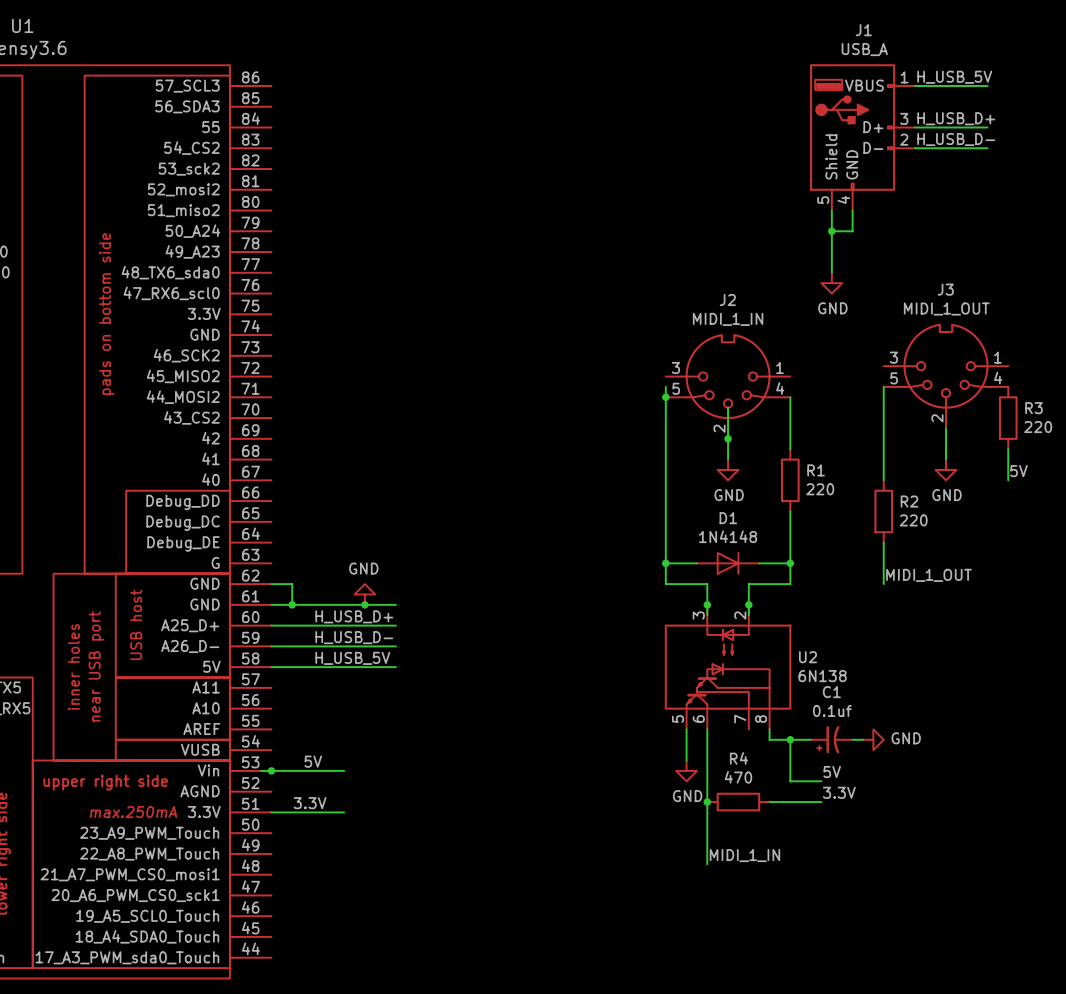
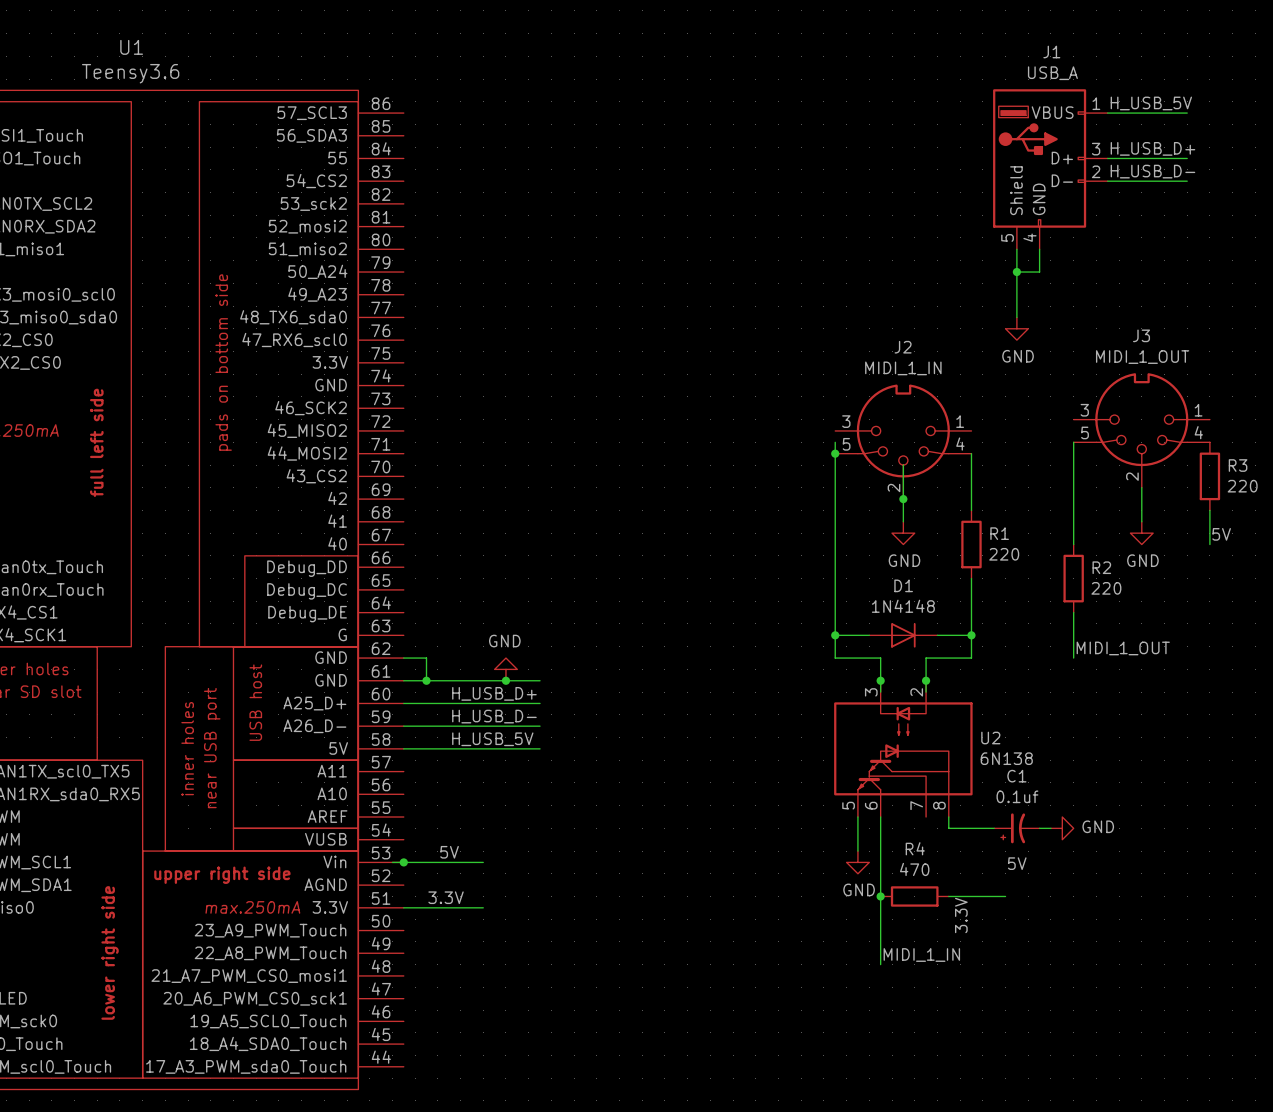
wire: (790, 739) (790, 781) (821, 781) -> none
junction: (790, 739) -> none
label rotation: 0° (839, 792) -> 90° counterclockwise (961, 915)
label position: 3.3V (839, 792) -> 3.3V (961, 915)

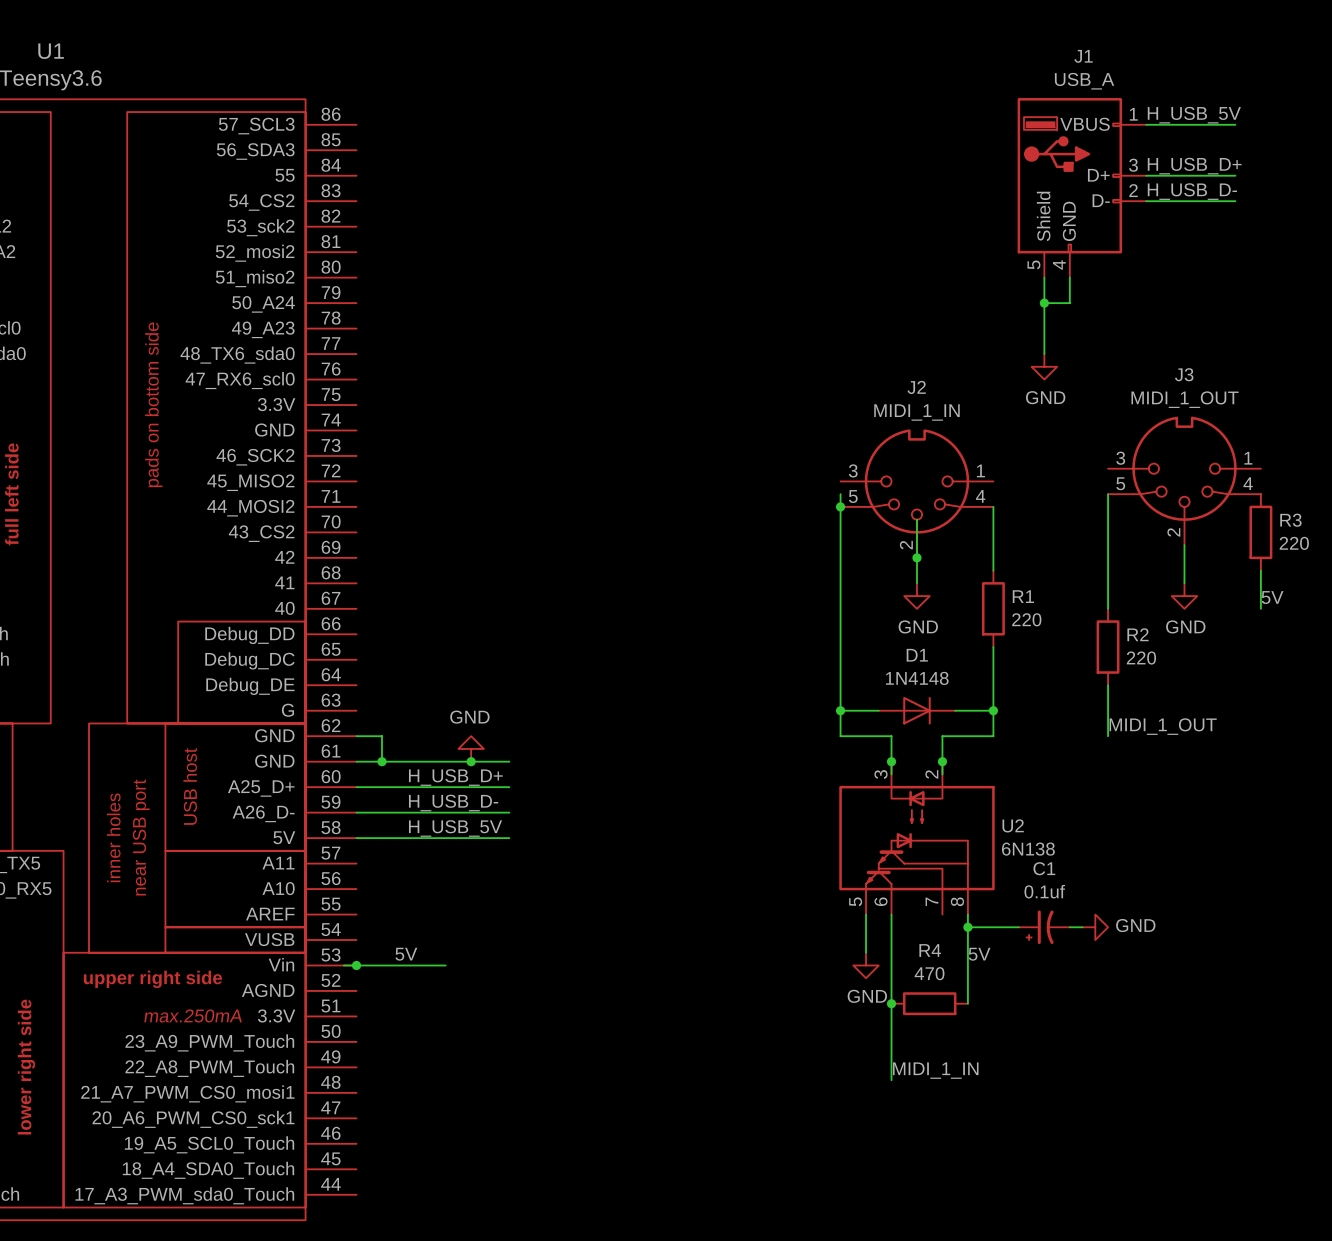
junction: none -> (967, 927)
label position: 5V (1017, 863) -> 5V (979, 954)
wire: (948, 896) (1005, 896) -> (967, 1003) (967, 927)
label: 3.3V (446, 897) -> none
wire: (403, 907) (483, 907) -> none
label: 3.3V (961, 915) -> none

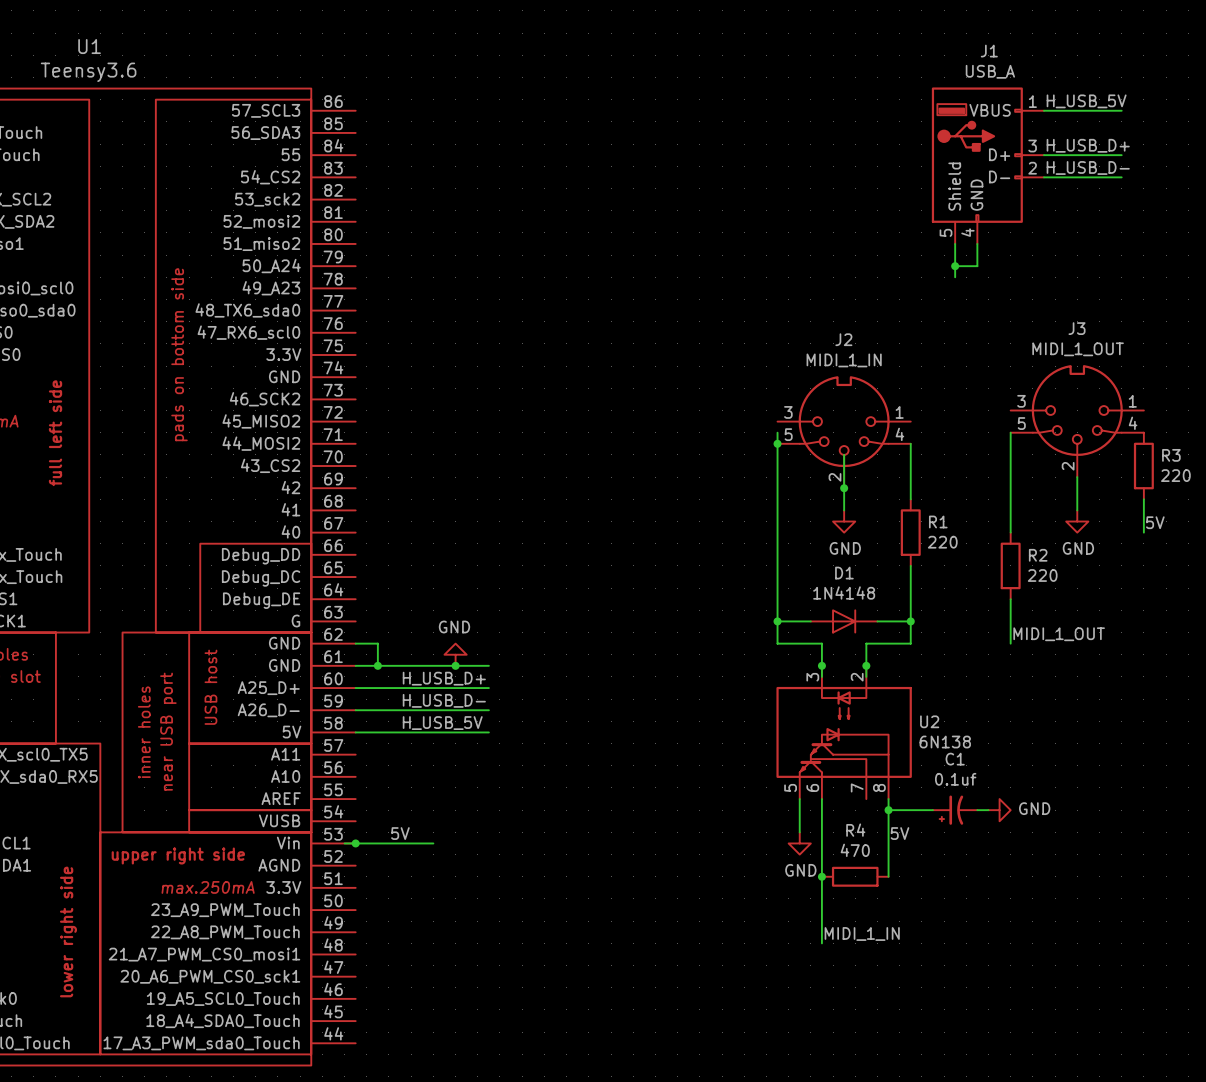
wire: (1044, 315) (1044, 354) -> none
power symbol: GND (1044, 366) -> none

